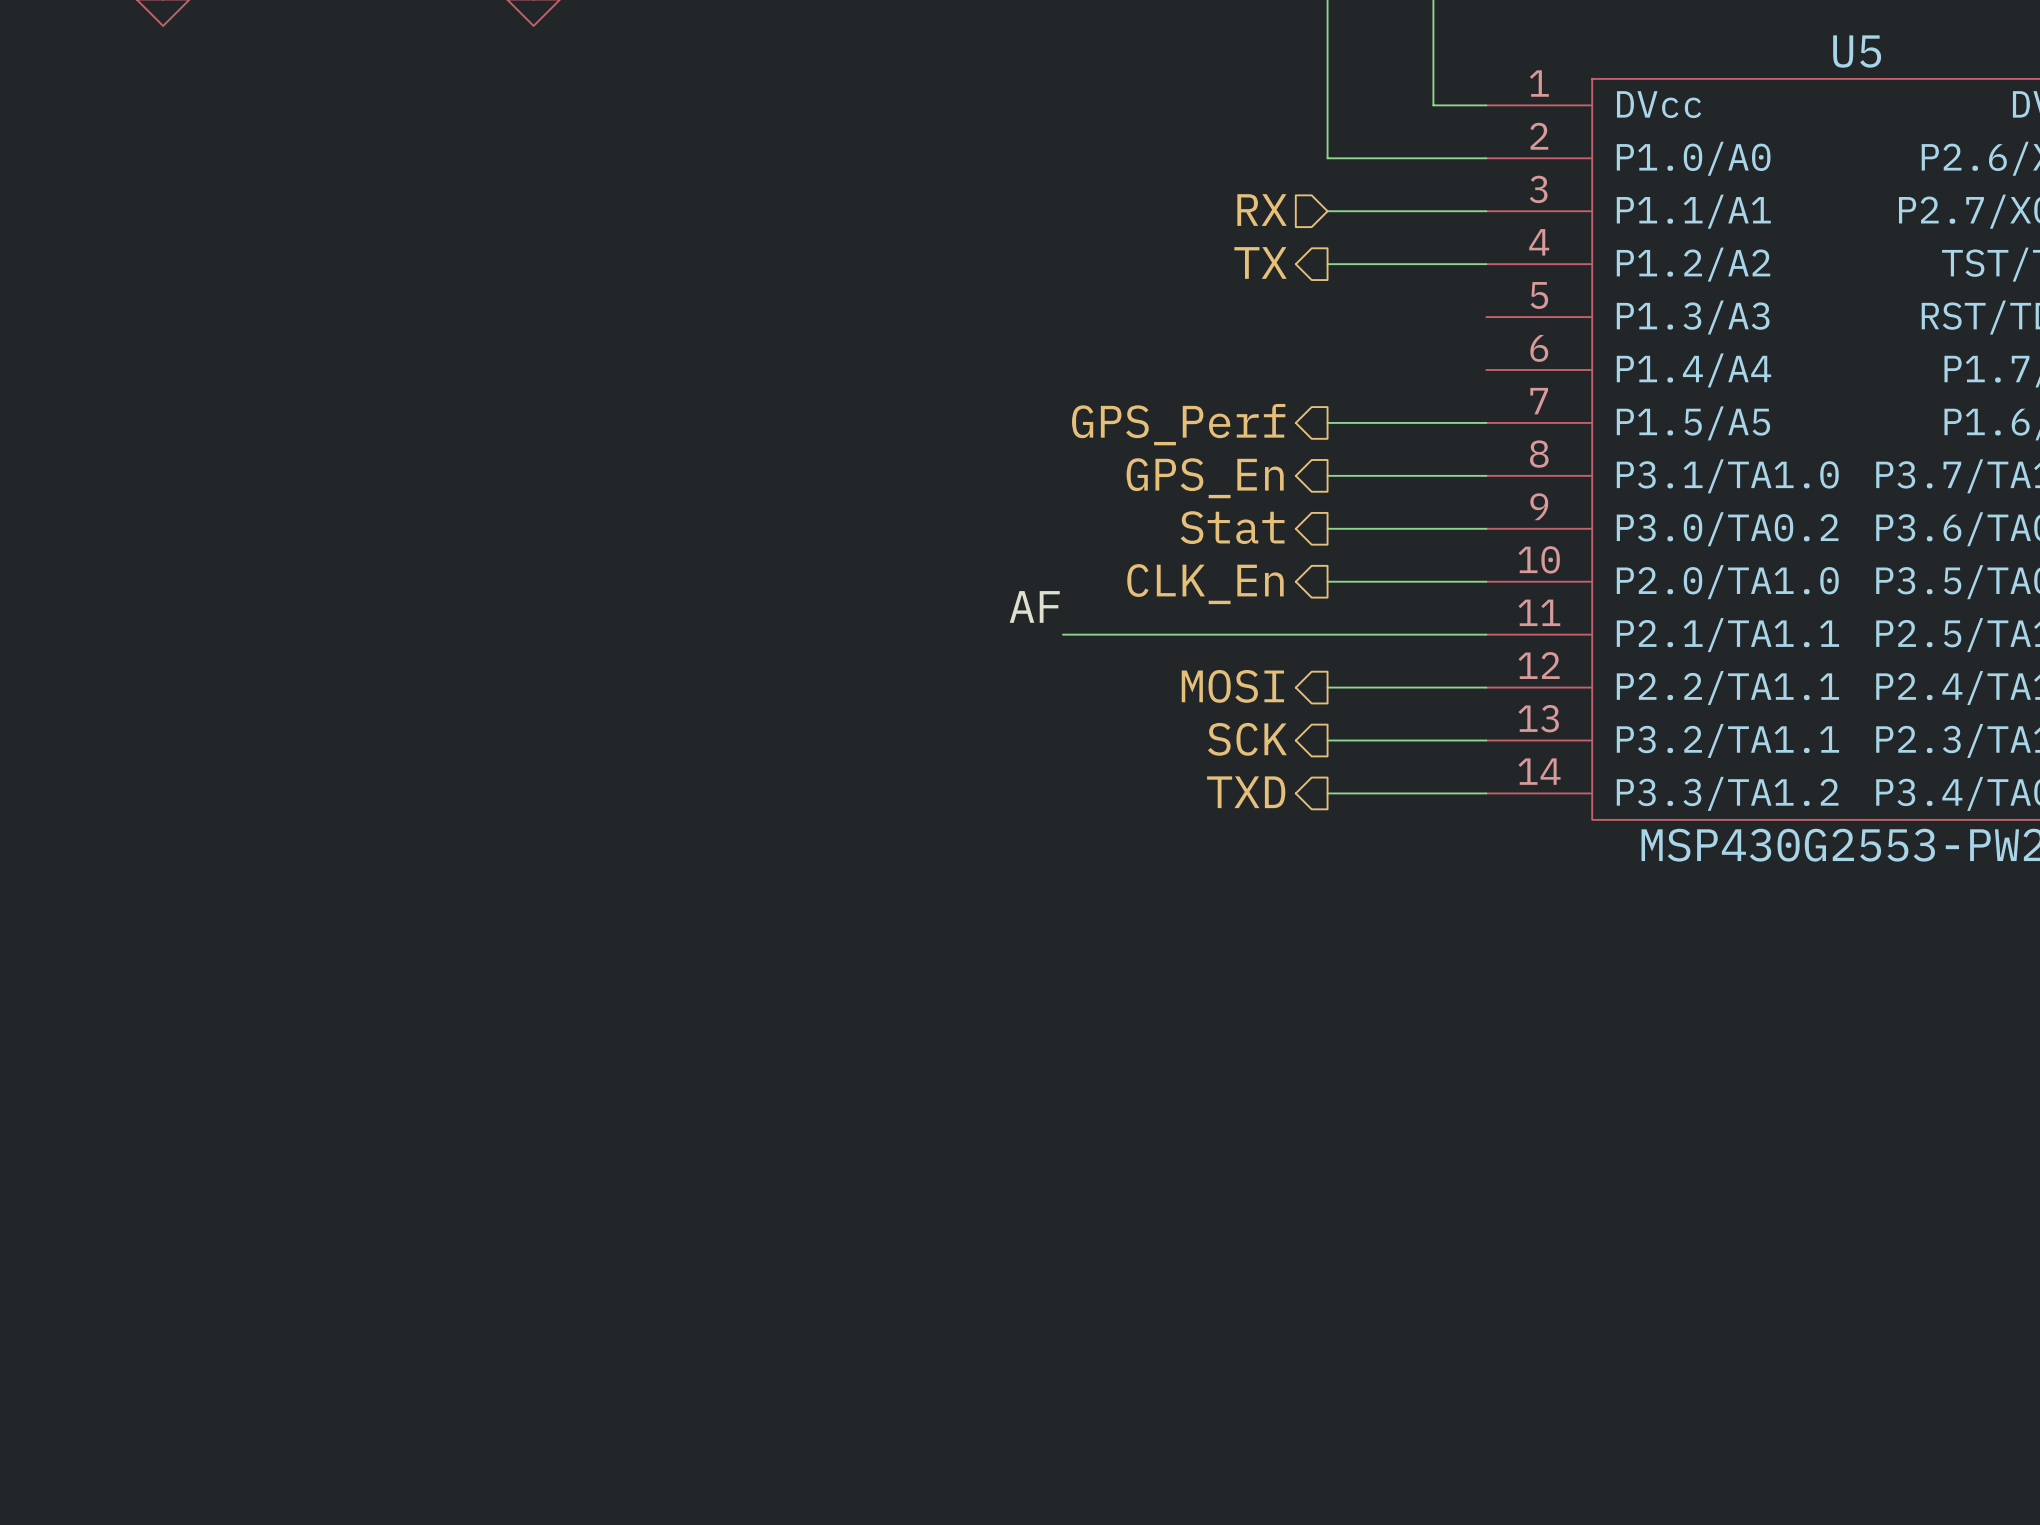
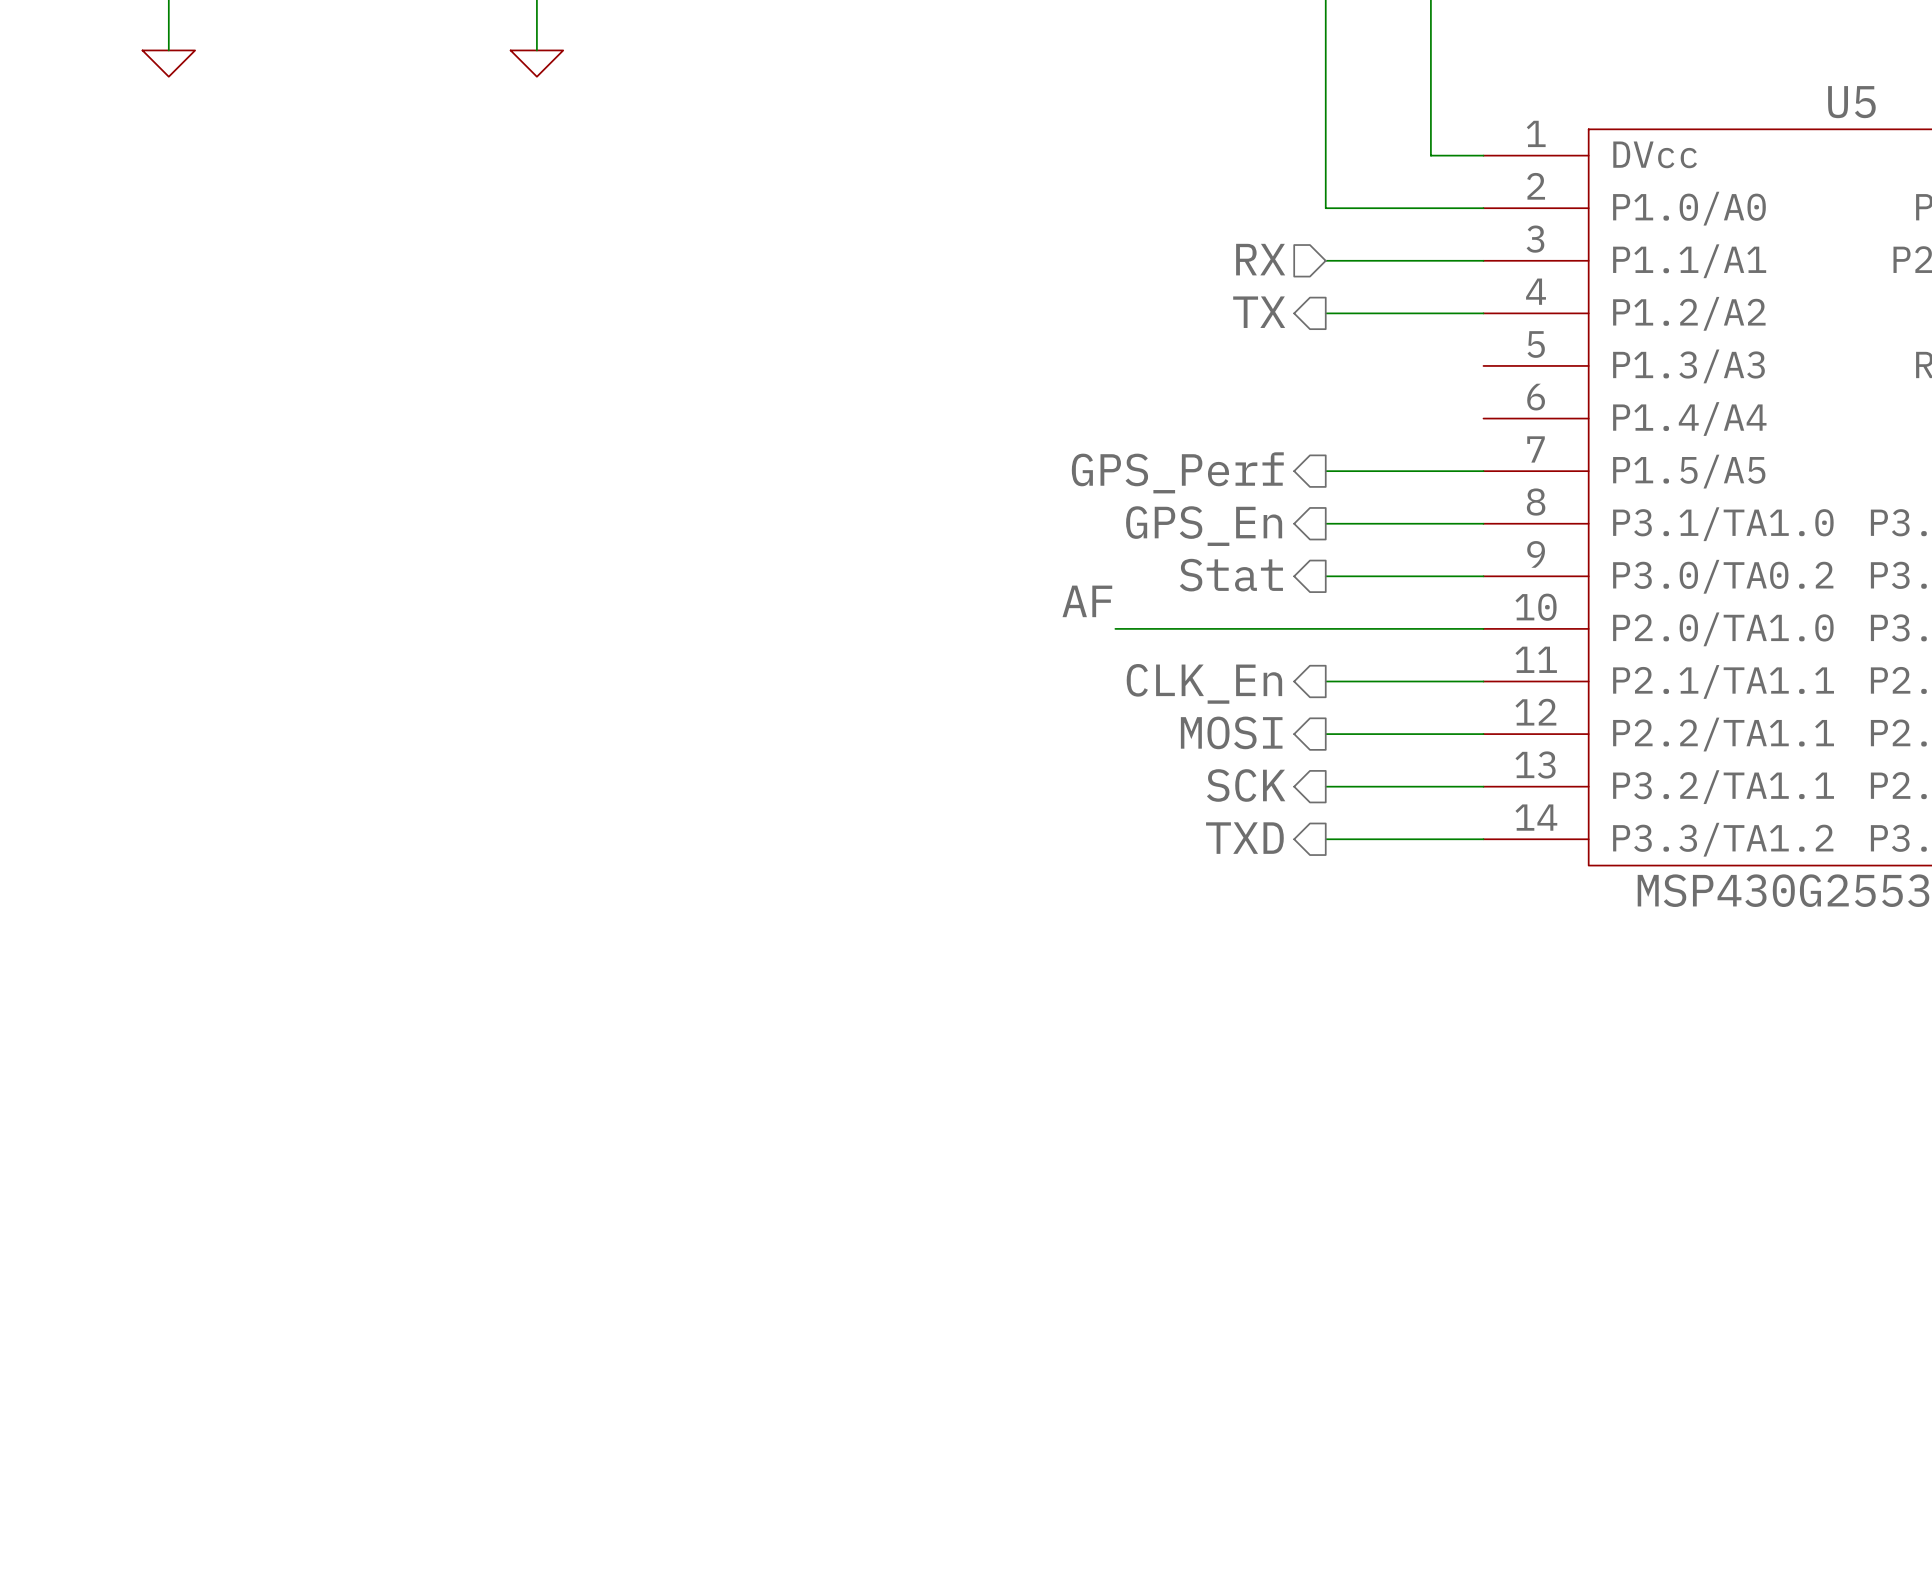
wire: none -> (1115, 628) (1325, 628)
hierarchical label position: CLK_En (1205, 584) -> CLK_En (1204, 683)
label position: AF (1034, 606) -> AF (1087, 601)
wire: (1062, 634) (1327, 634) -> none

